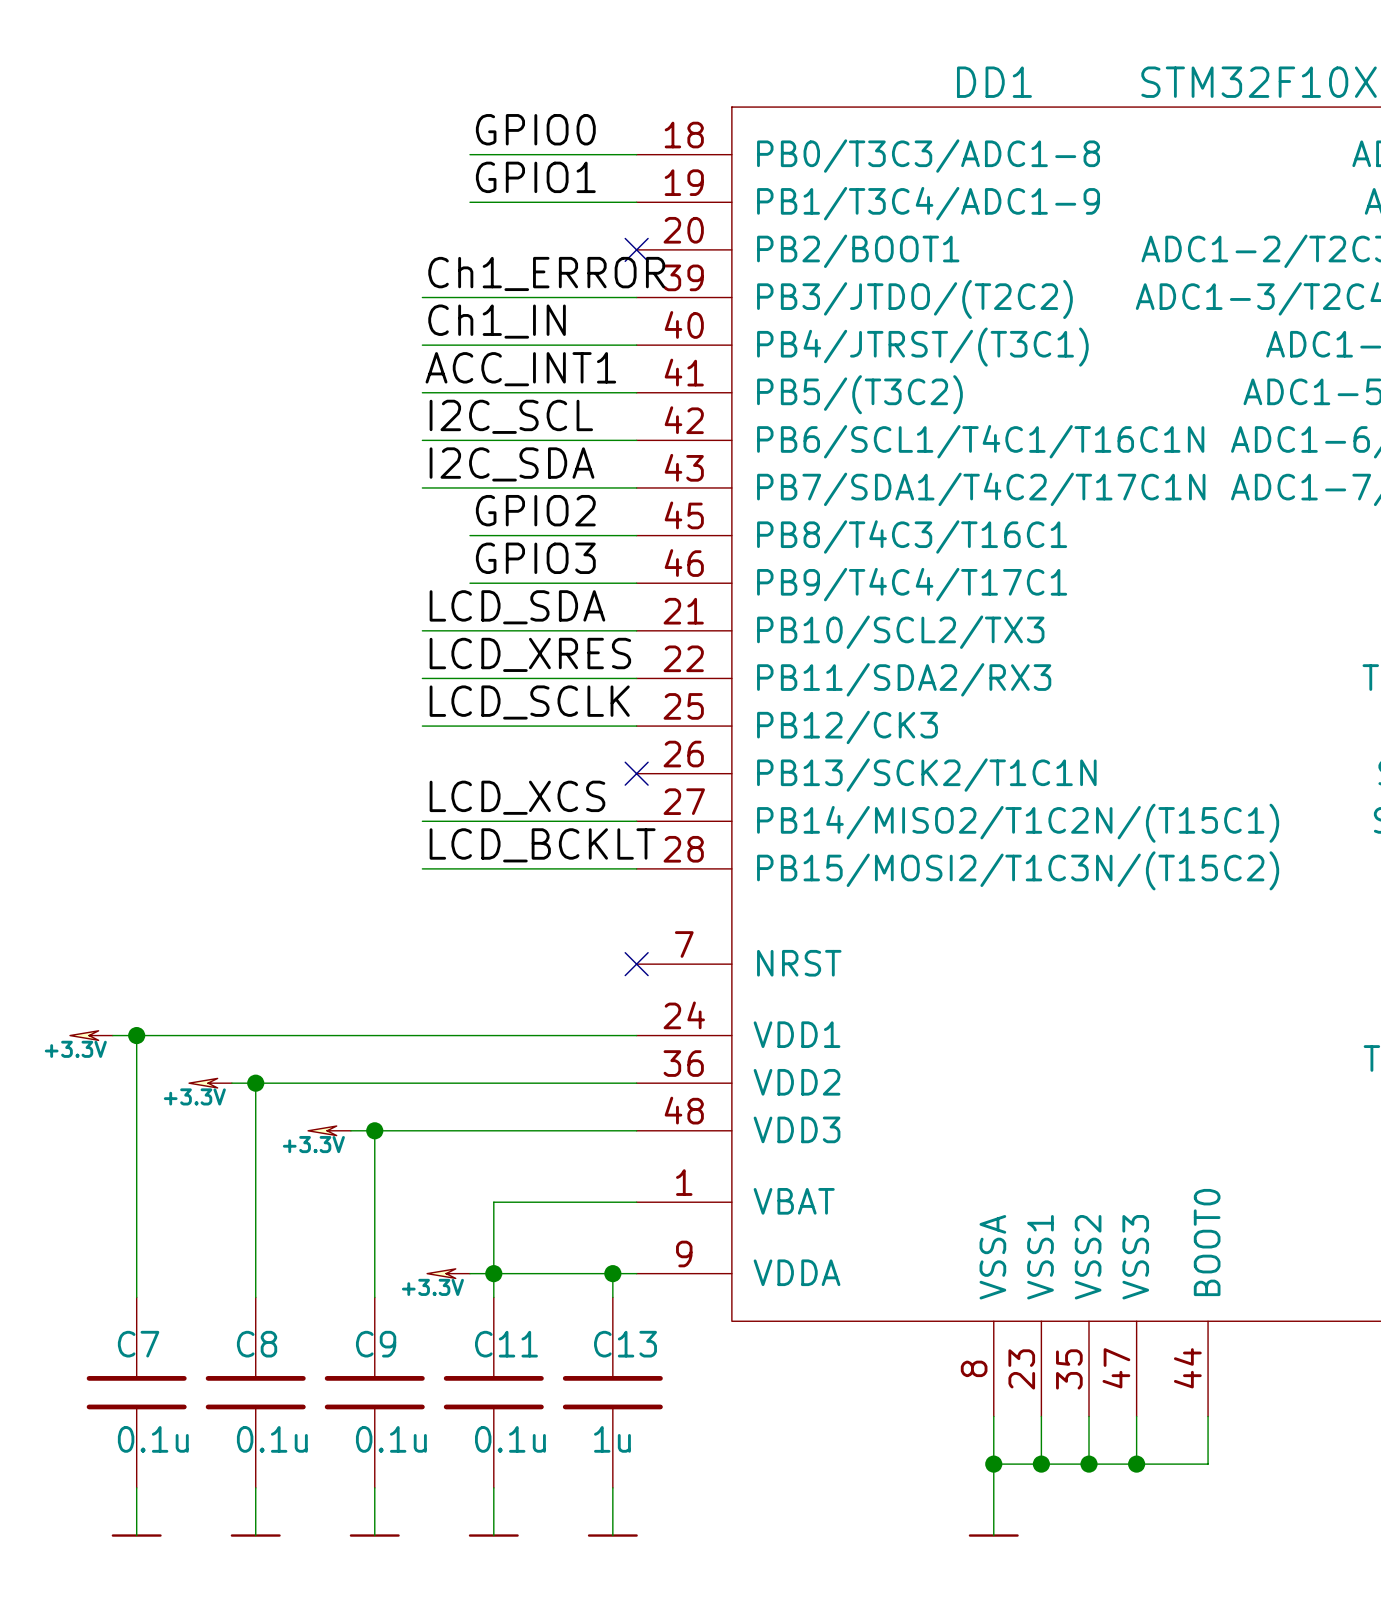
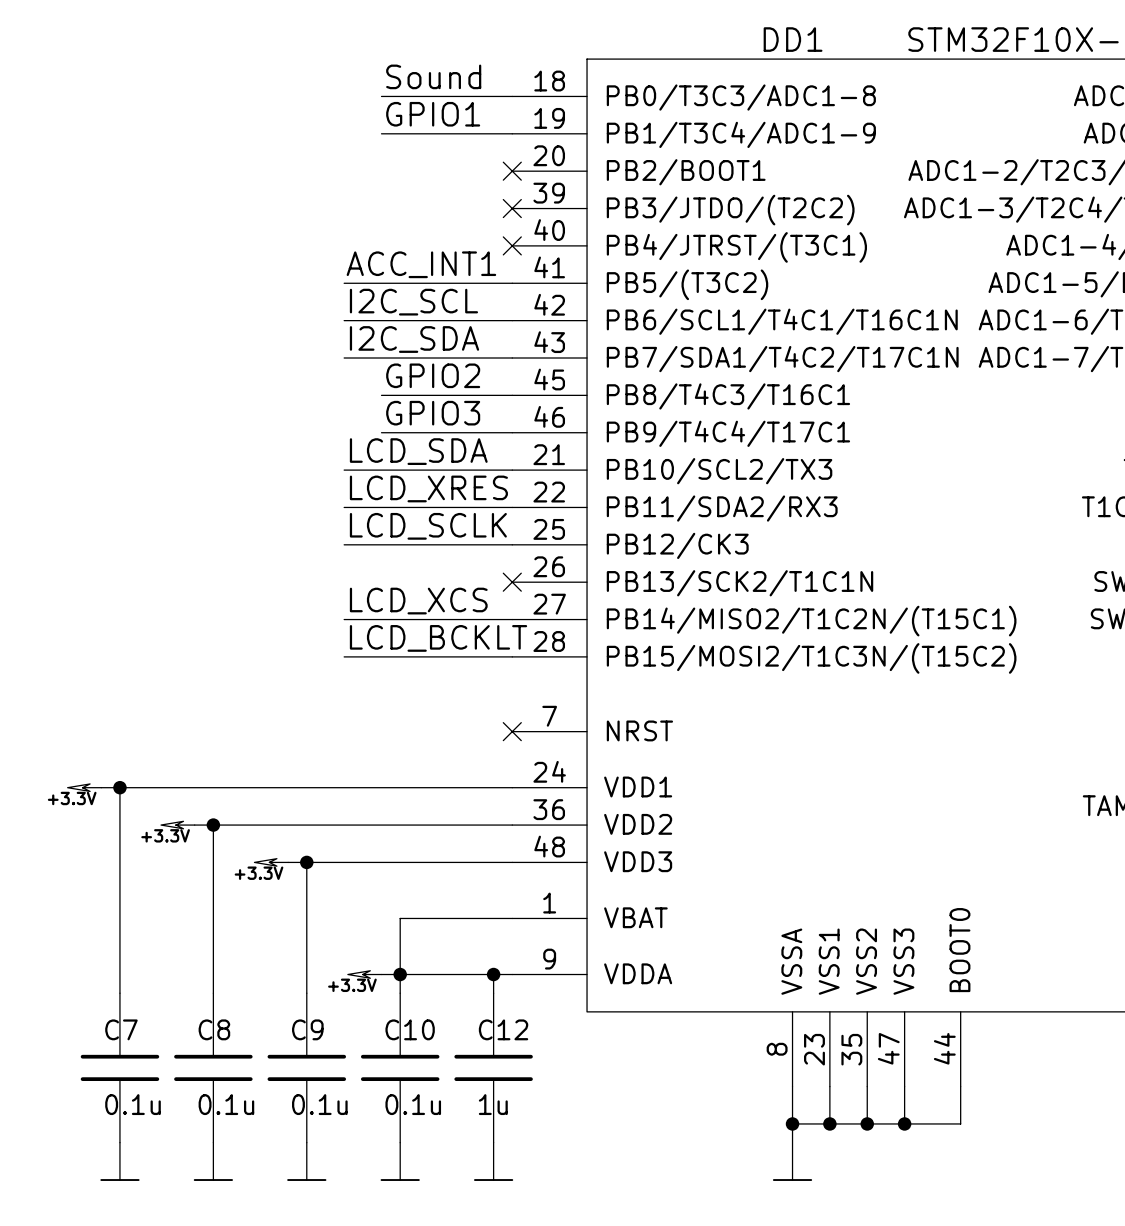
label: GPIO0 (535, 129) -> Sound (433, 76)
label: Ch1_ERROR (546, 273) -> none
wire: (422, 297) (636, 297) -> none
no-connect mark: none -> (512, 208)
label: Ch1_IN (497, 321) -> none
wire: (422, 345) (636, 345) -> none
no-connect mark: none -> (512, 245)
C11 name: C11 (506, 1344) -> C10 (410, 1029)
C13 name: C13 (625, 1344) -> C12 (503, 1029)

